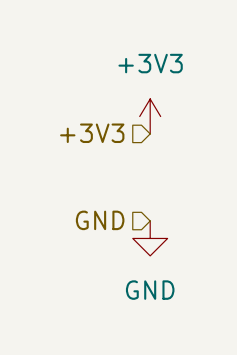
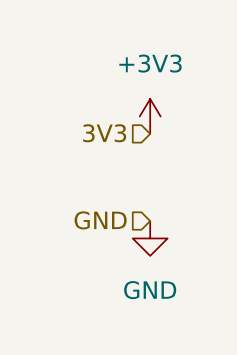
hierarchical label: +3V3 (92, 133) -> 3V3 (104, 133)

